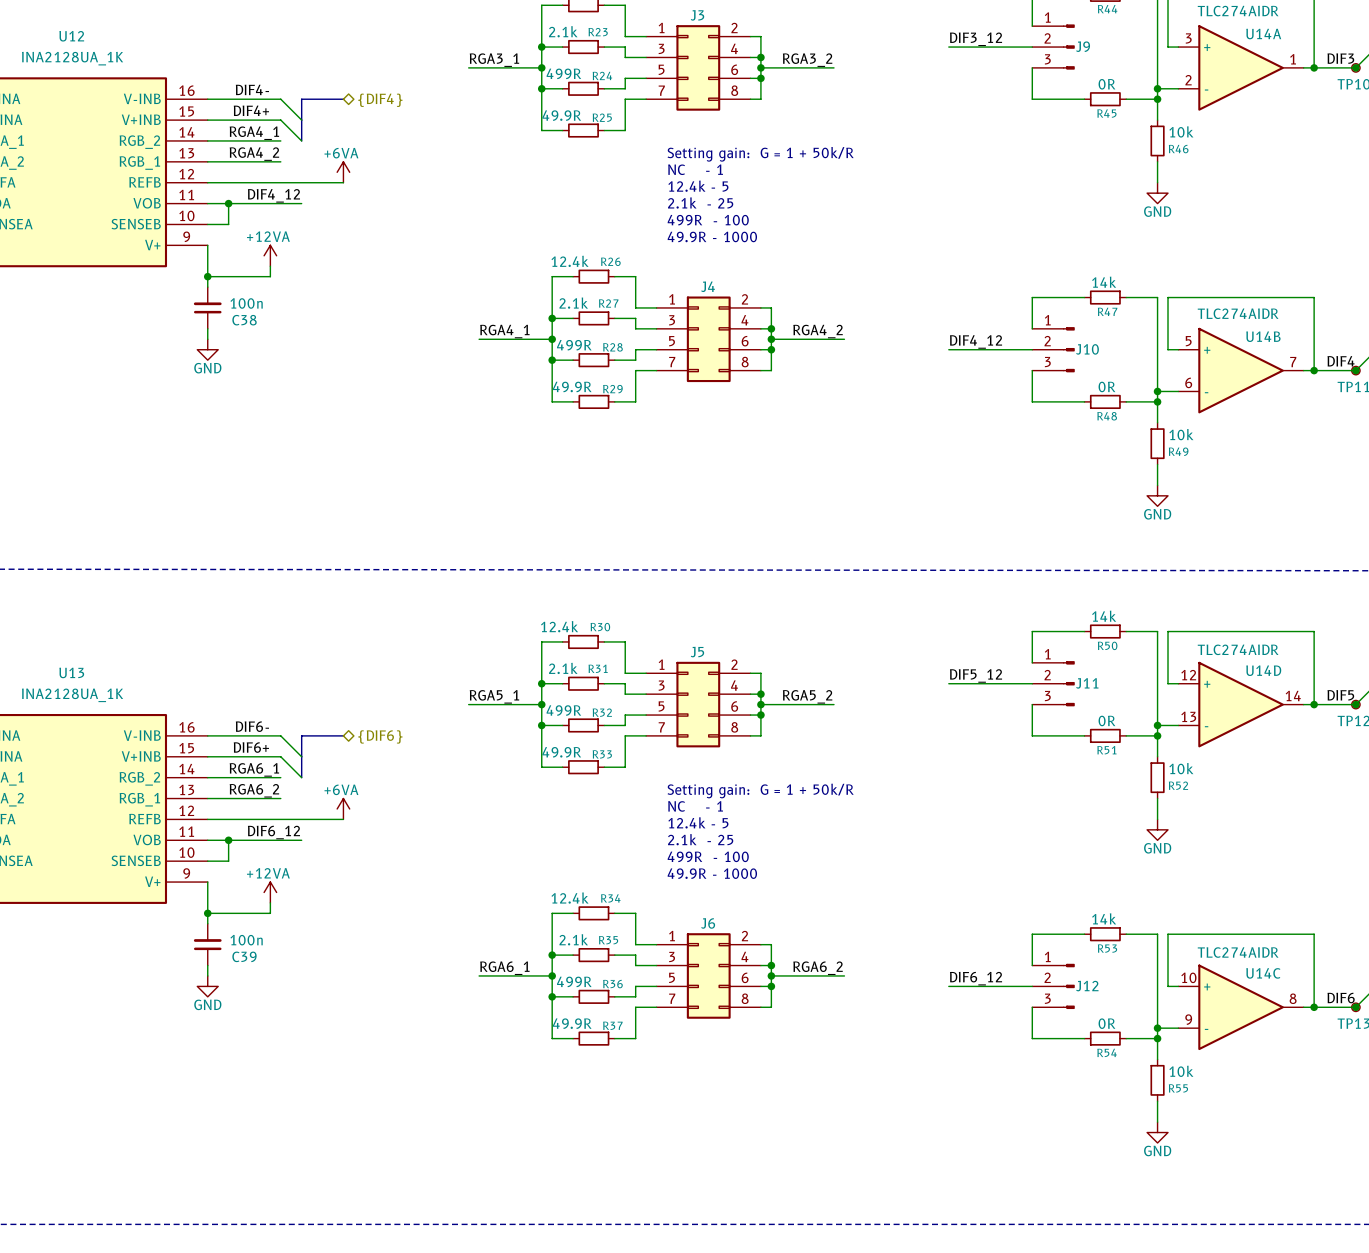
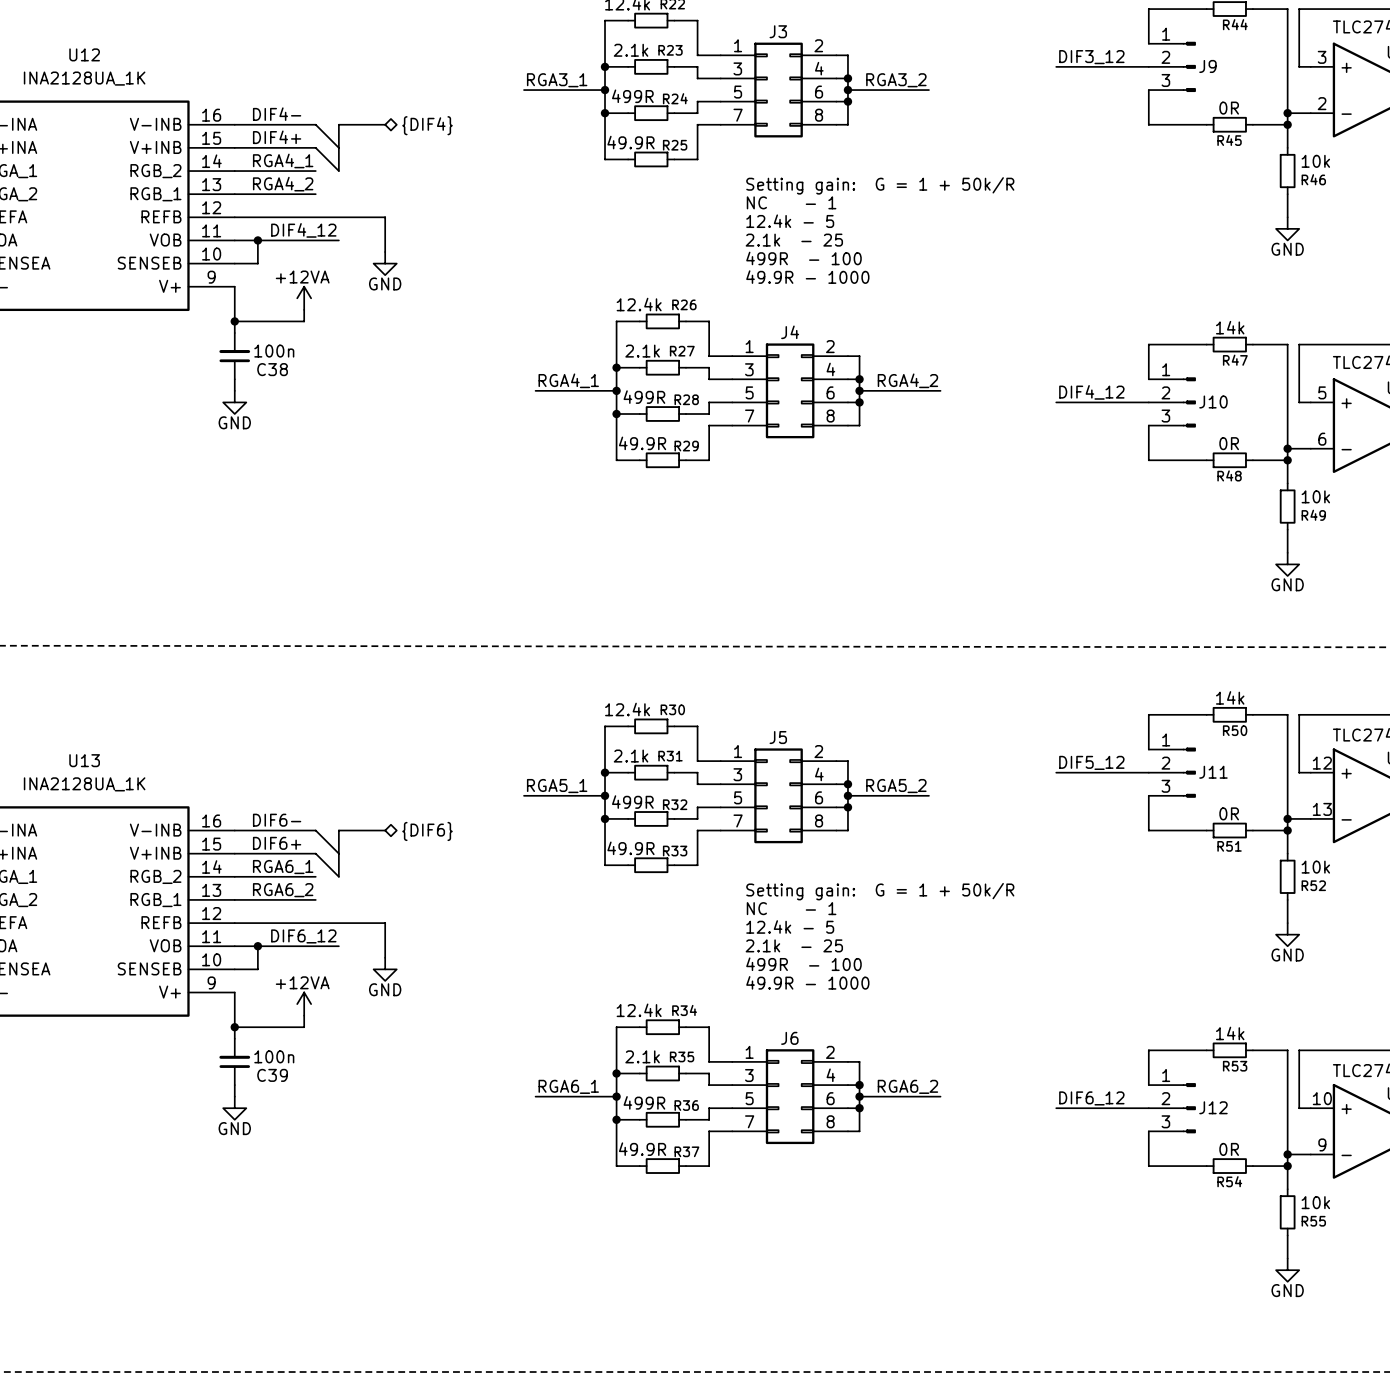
power symbol: +6VA (343, 172) -> none
wire: none -> (385, 217) (385, 252)
power symbol: none -> GND (385, 263)
power symbol: +6VA (343, 808) -> none
wire: none -> (385, 923) (385, 957)
power symbol: none -> GND (385, 969)

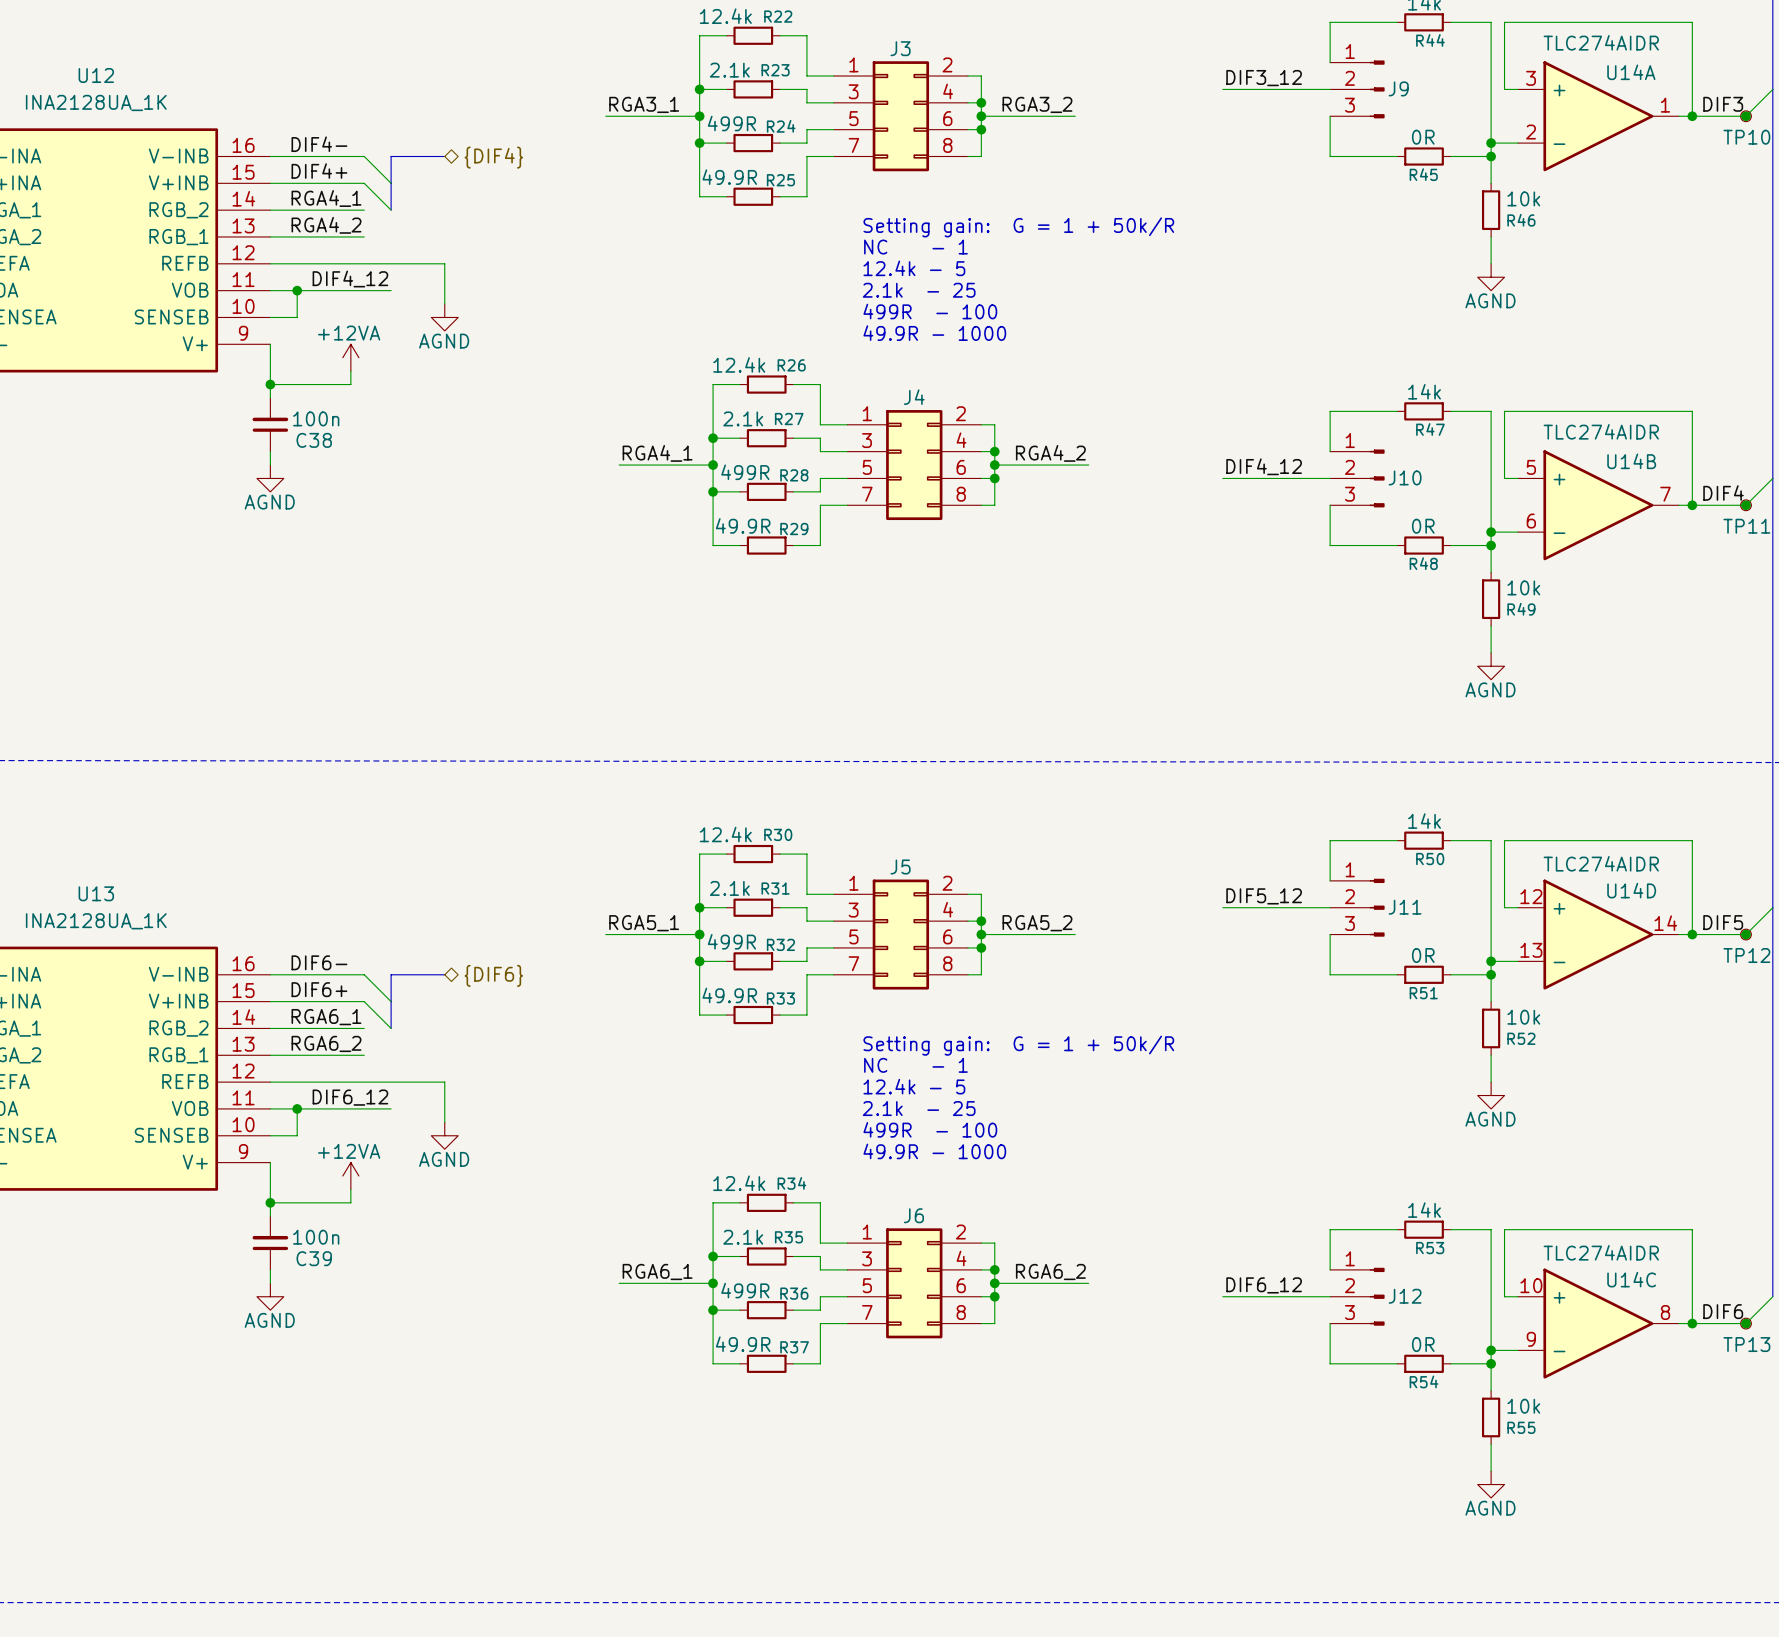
power symbol: GND (1287, 228) -> AGND (1491, 277)
power symbol: GND (385, 263) -> AGND (444, 317)
power symbol: GND (234, 402) -> AGND (270, 478)
power symbol: GND (1287, 564) -> AGND (1491, 666)
power symbol: GND (1287, 934) -> AGND (1491, 1095)
power symbol: GND (385, 969) -> AGND (444, 1135)
power symbol: GND (234, 1108) -> AGND (270, 1296)
power symbol: GND (1287, 1270) -> AGND (1491, 1484)

